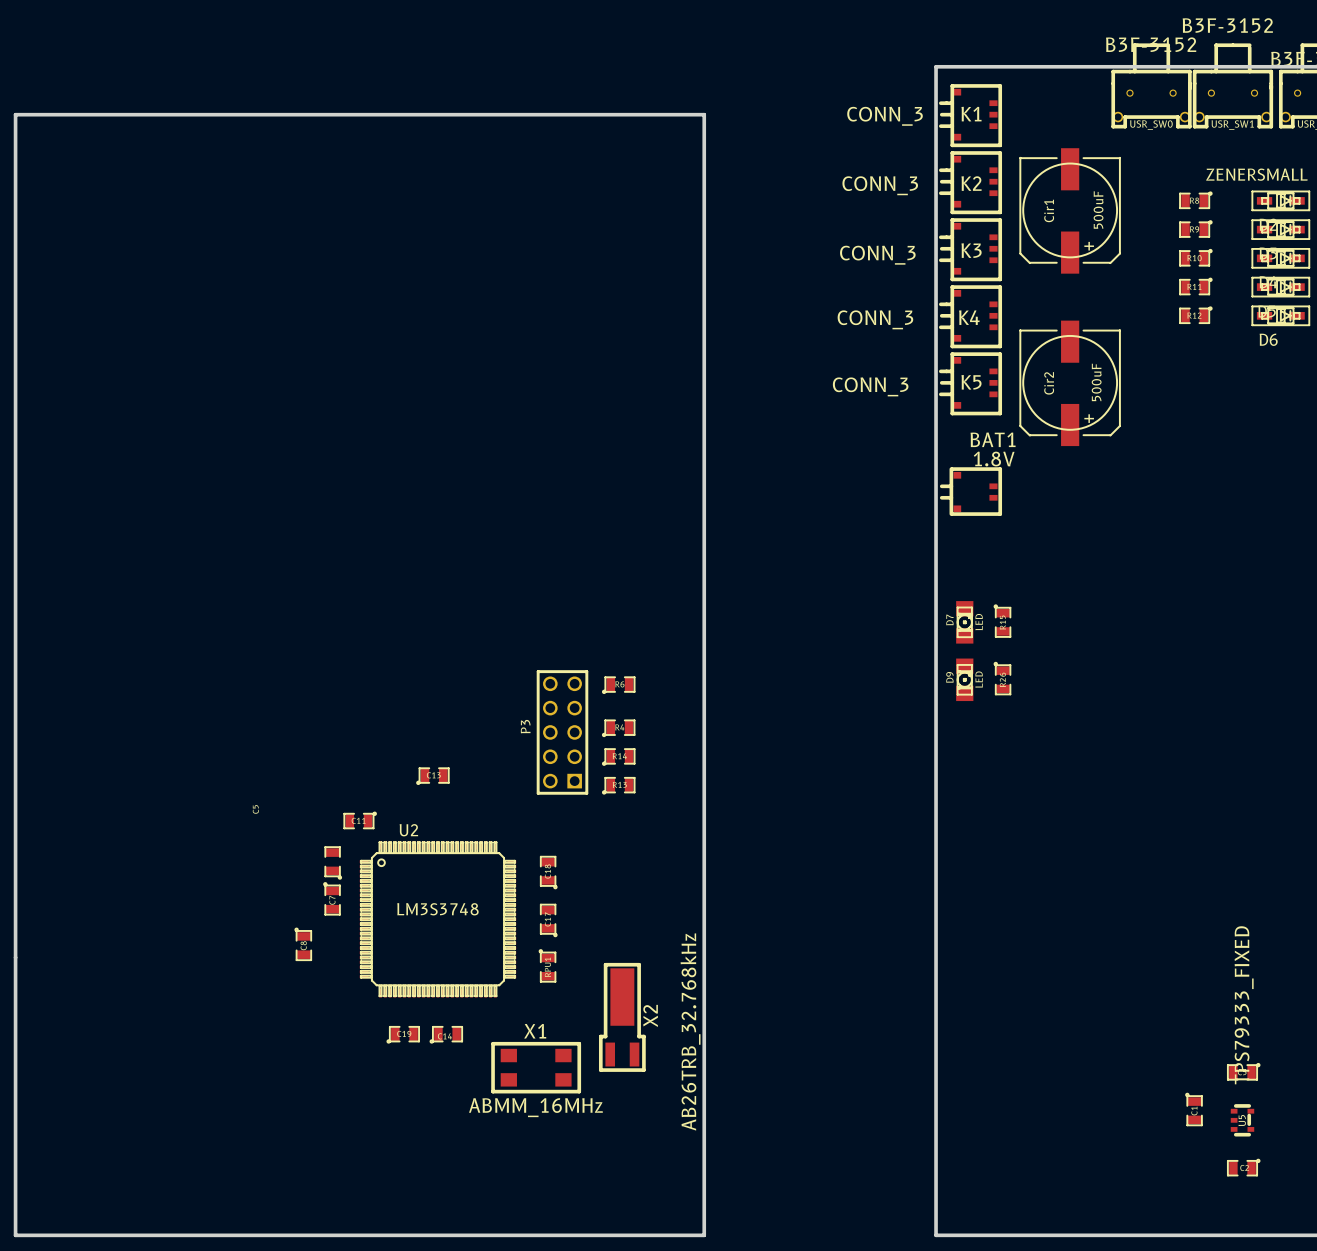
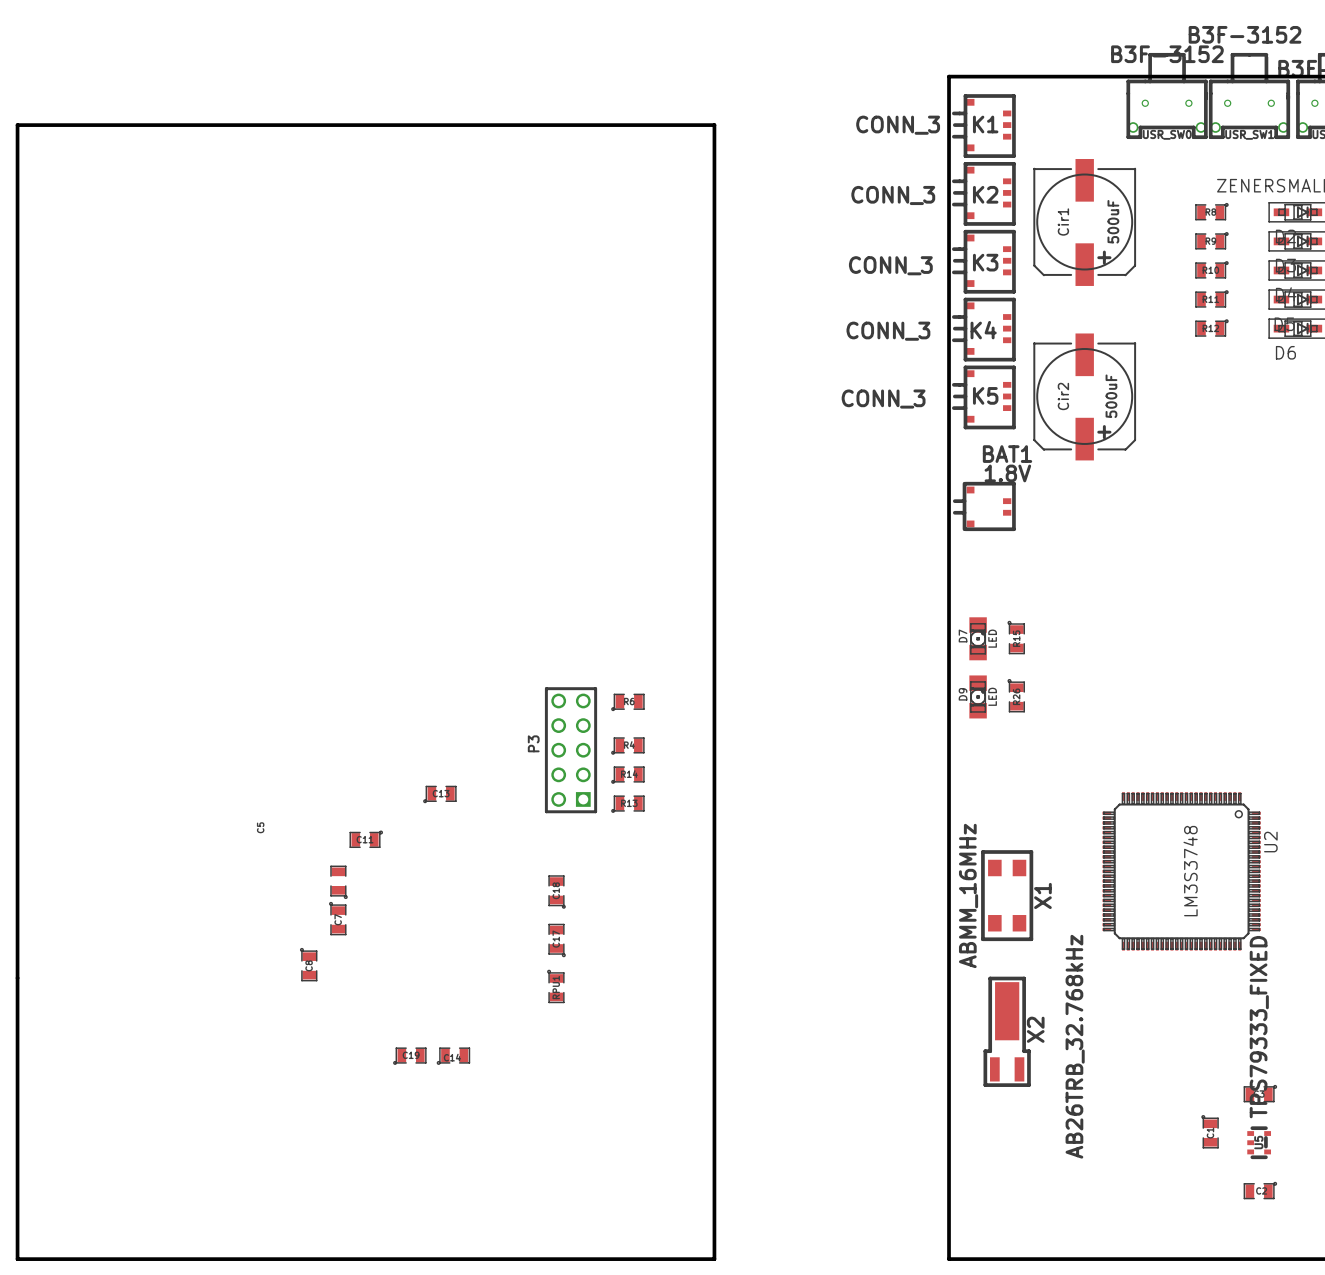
U2 rotation: 0° (437, 919) -> 90° clockwise (1181, 871)
U2 position: (437, 919) -> (1181, 871)
X2 position: (622, 1017) -> (1007, 1031)
X1 rotation: 0° (536, 1067) -> 90° clockwise (1007, 895)
X1 position: (536, 1067) -> (1007, 895)

